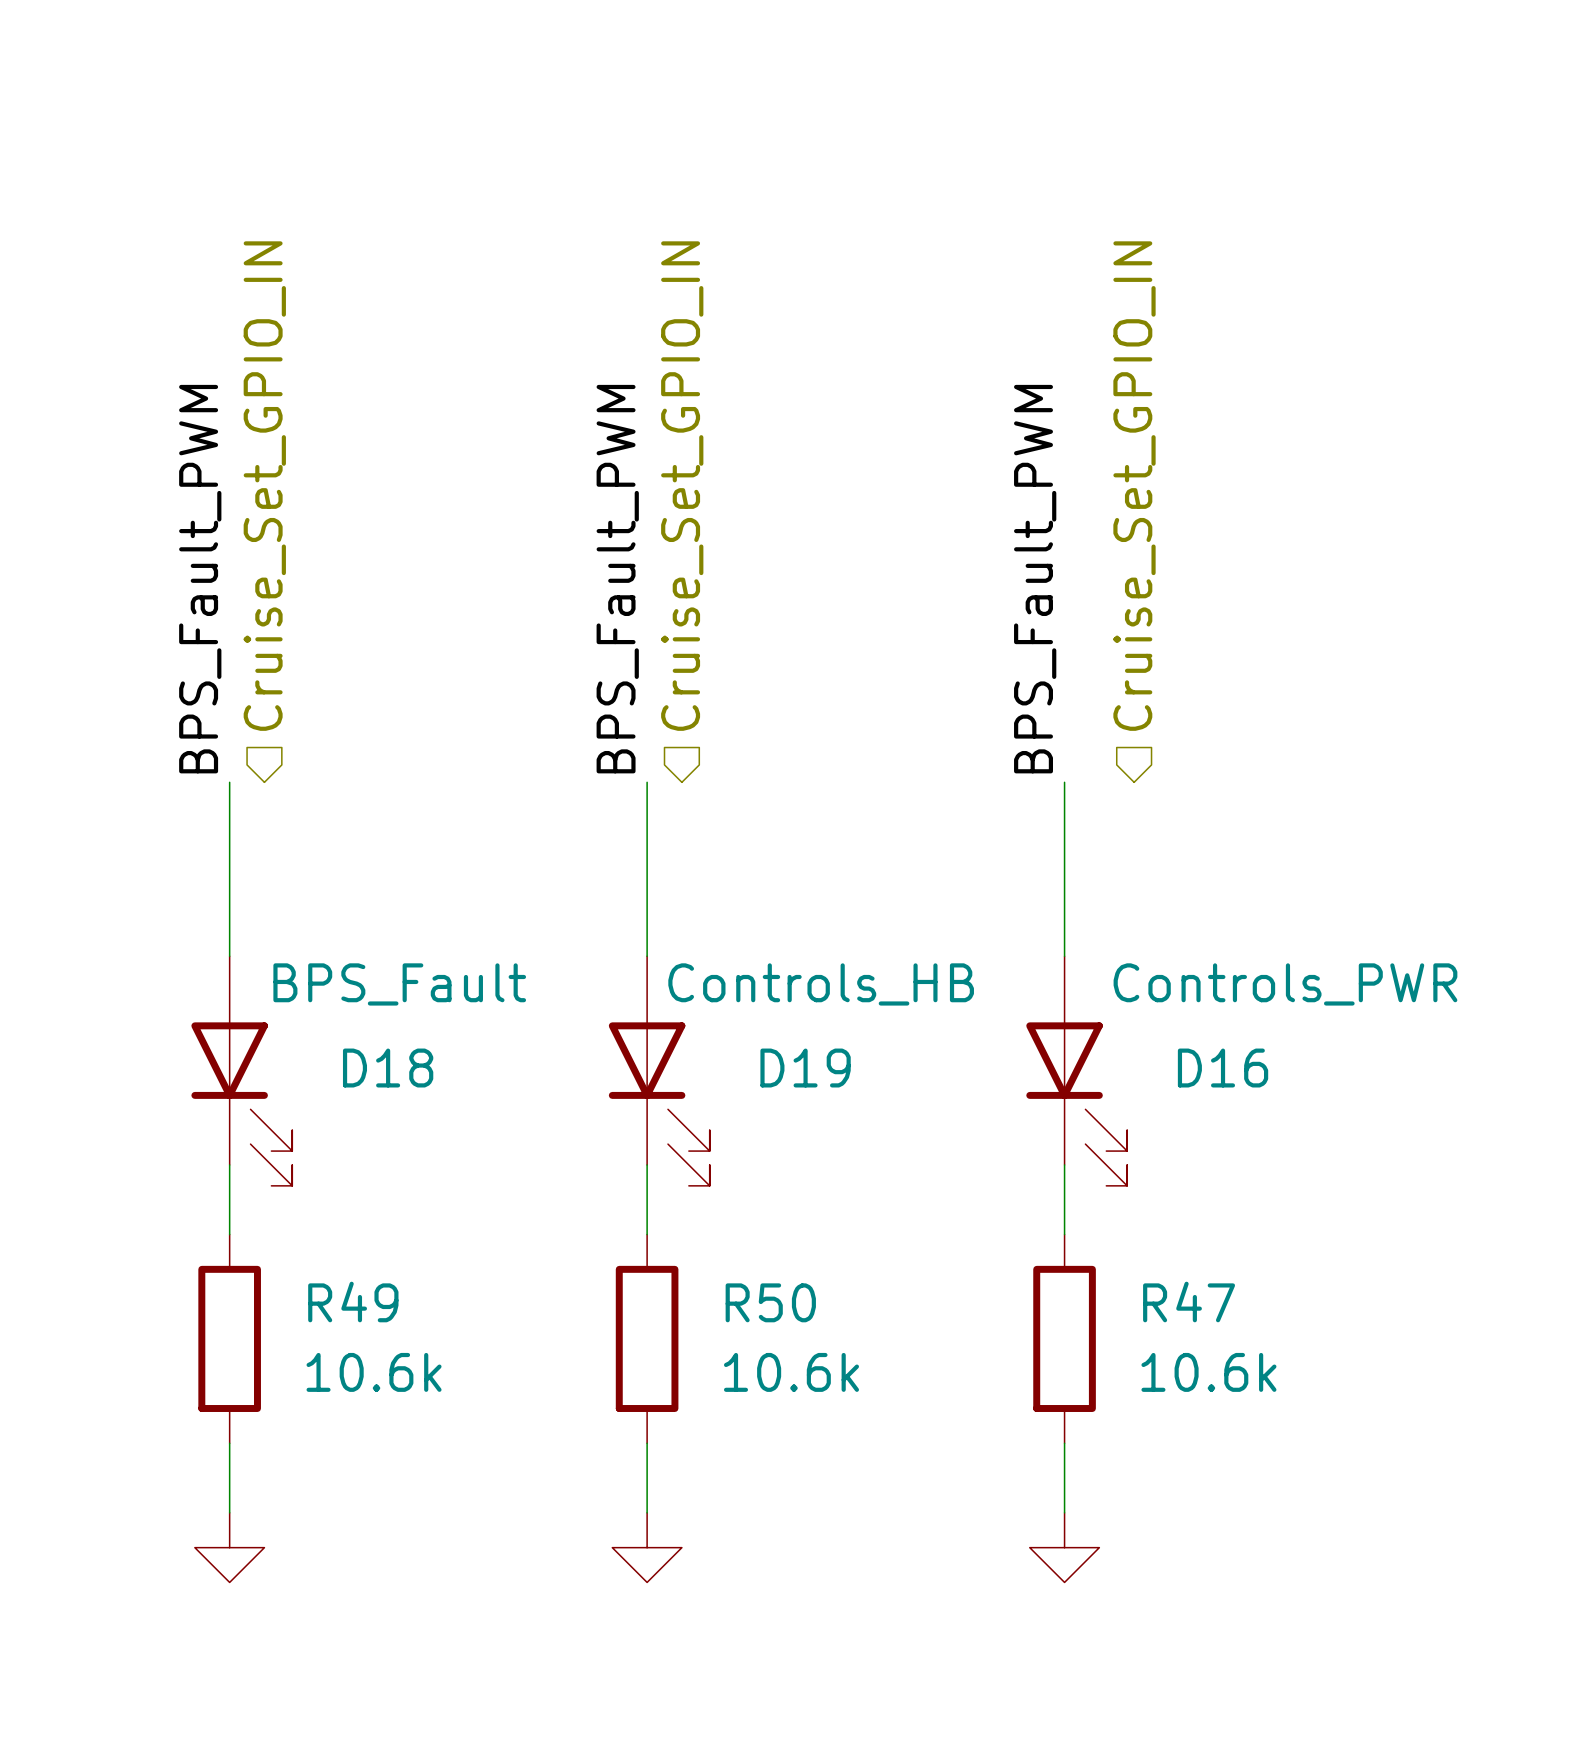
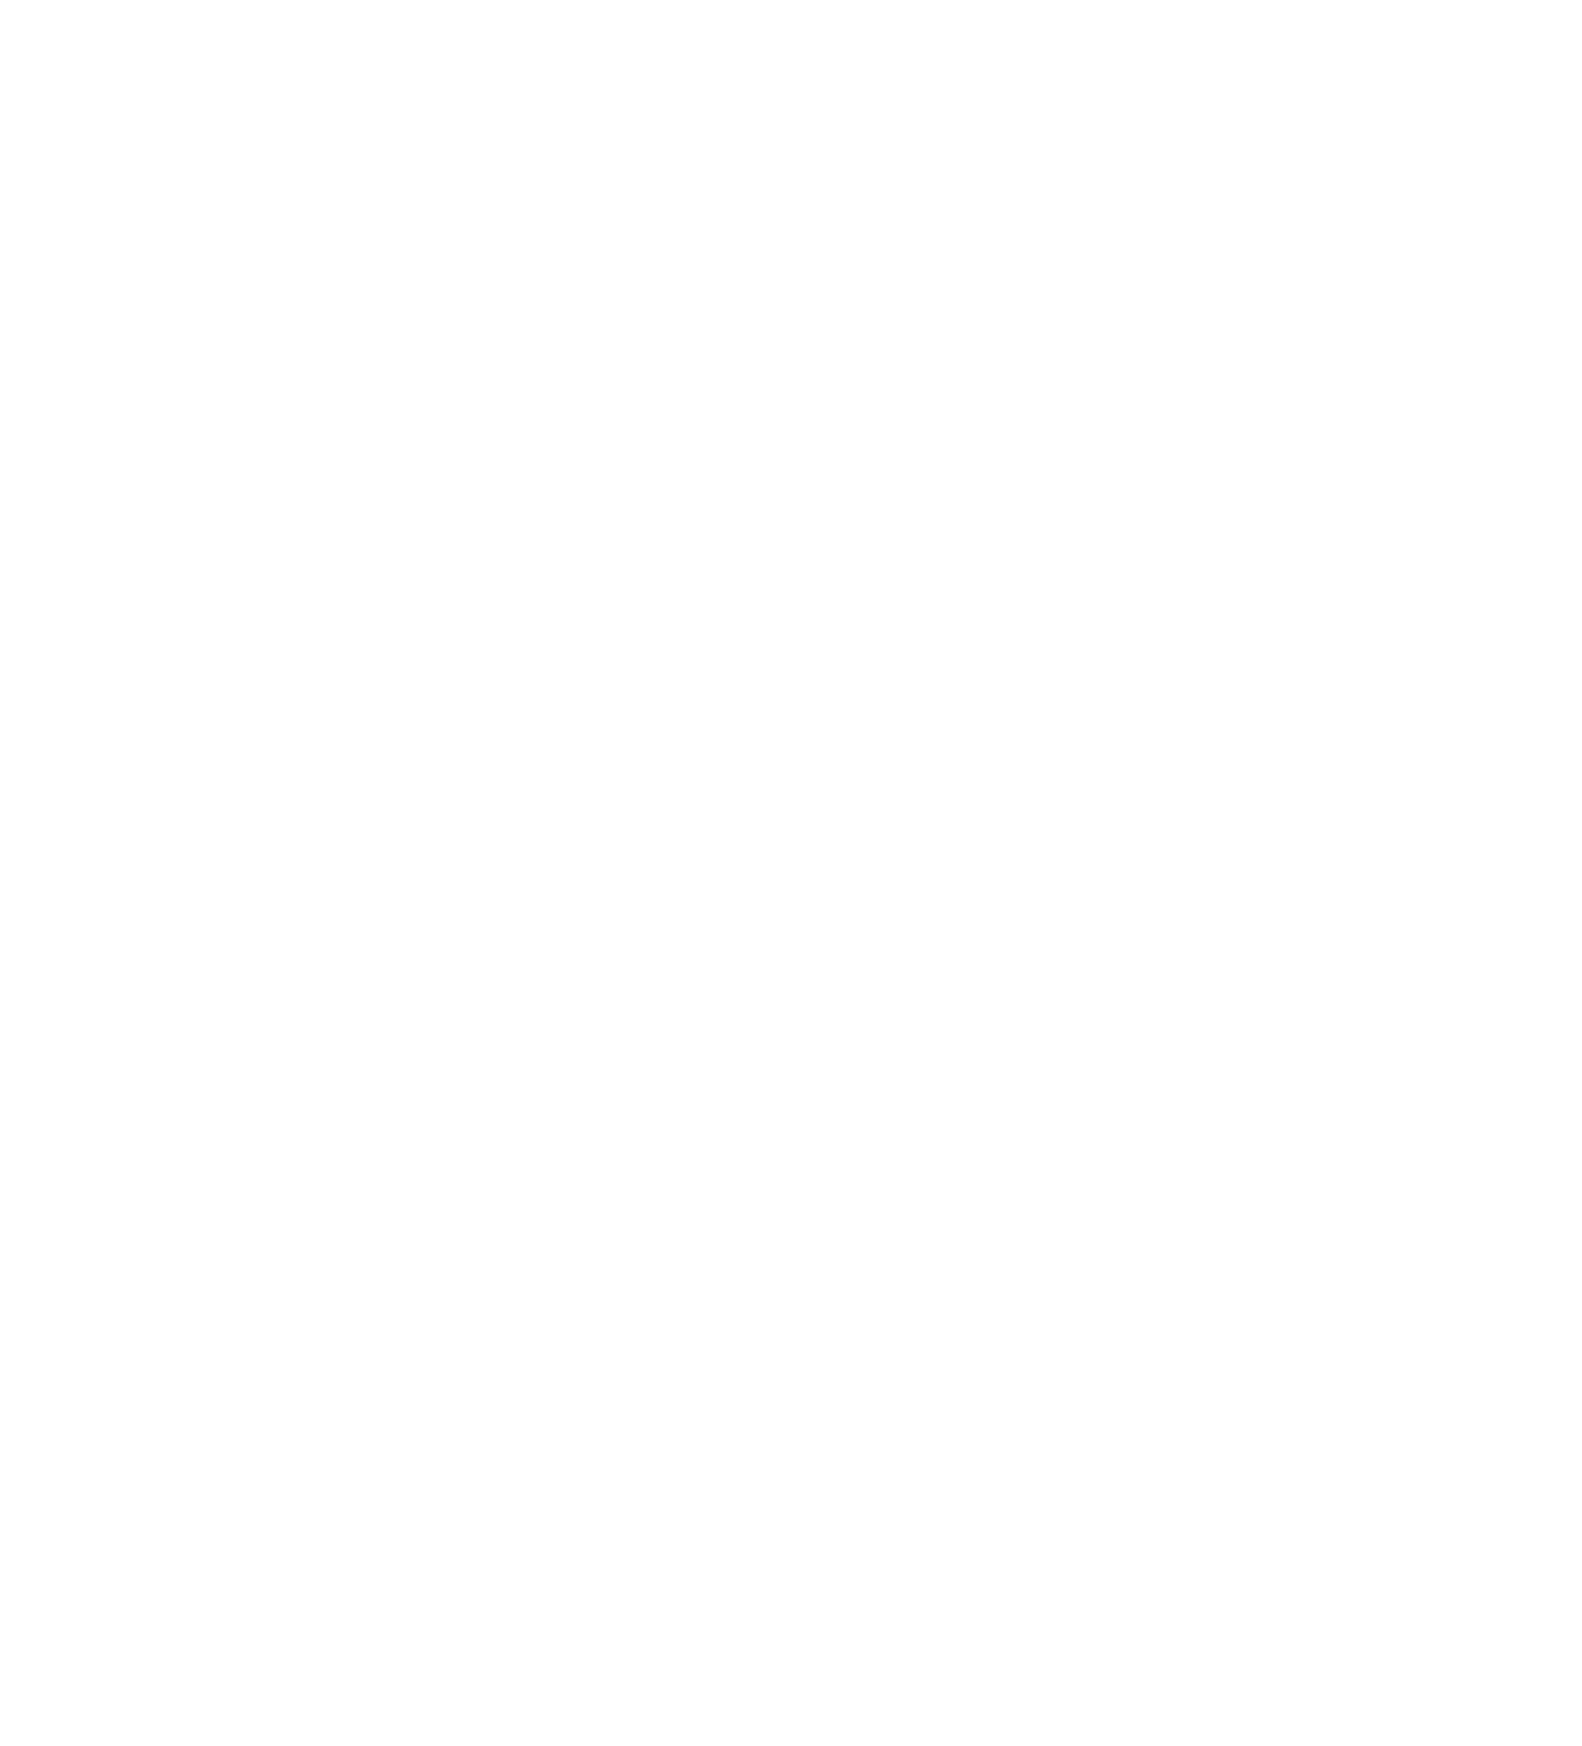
hierarchical label: Cruise_Set_GPIO_IN (264, 486) -> none
hierarchical label: Cruise_Set_GPIO_IN (682, 486) -> none
hierarchical label: Cruise_Set_GPIO_IN (1134, 486) -> none
label: BPS_Fault_PWM (200, 579) -> none
label: BPS_Fault_PWM (617, 579) -> none
label: BPS_Fault_PWM (1035, 579) -> none
wire: (229, 782) (229, 956) -> none
wire: (647, 782) (647, 956) -> none
wire: (1064, 782) (1064, 956) -> none
D18: BPS_Fault (241, 1071) -> none
D19: Controls_HB (659, 1071) -> none
D16: Controls_PWR (1076, 1071) -> none
wire: (229, 1164) (229, 1234) -> none
wire: (647, 1164) (647, 1234) -> none
wire: (1064, 1164) (1064, 1234) -> none
R49: 10.6k (229, 1338) -> none
R50: 10.6k (647, 1338) -> none
R47: 10.6k (1064, 1338) -> none
wire: (229, 1443) (229, 1512) -> none
wire: (647, 1443) (647, 1512) -> none
wire: (1064, 1443) (1064, 1512) -> none
power symbol: (229, 1547) -> none
power symbol: (647, 1547) -> none
power symbol: (1064, 1547) -> none

